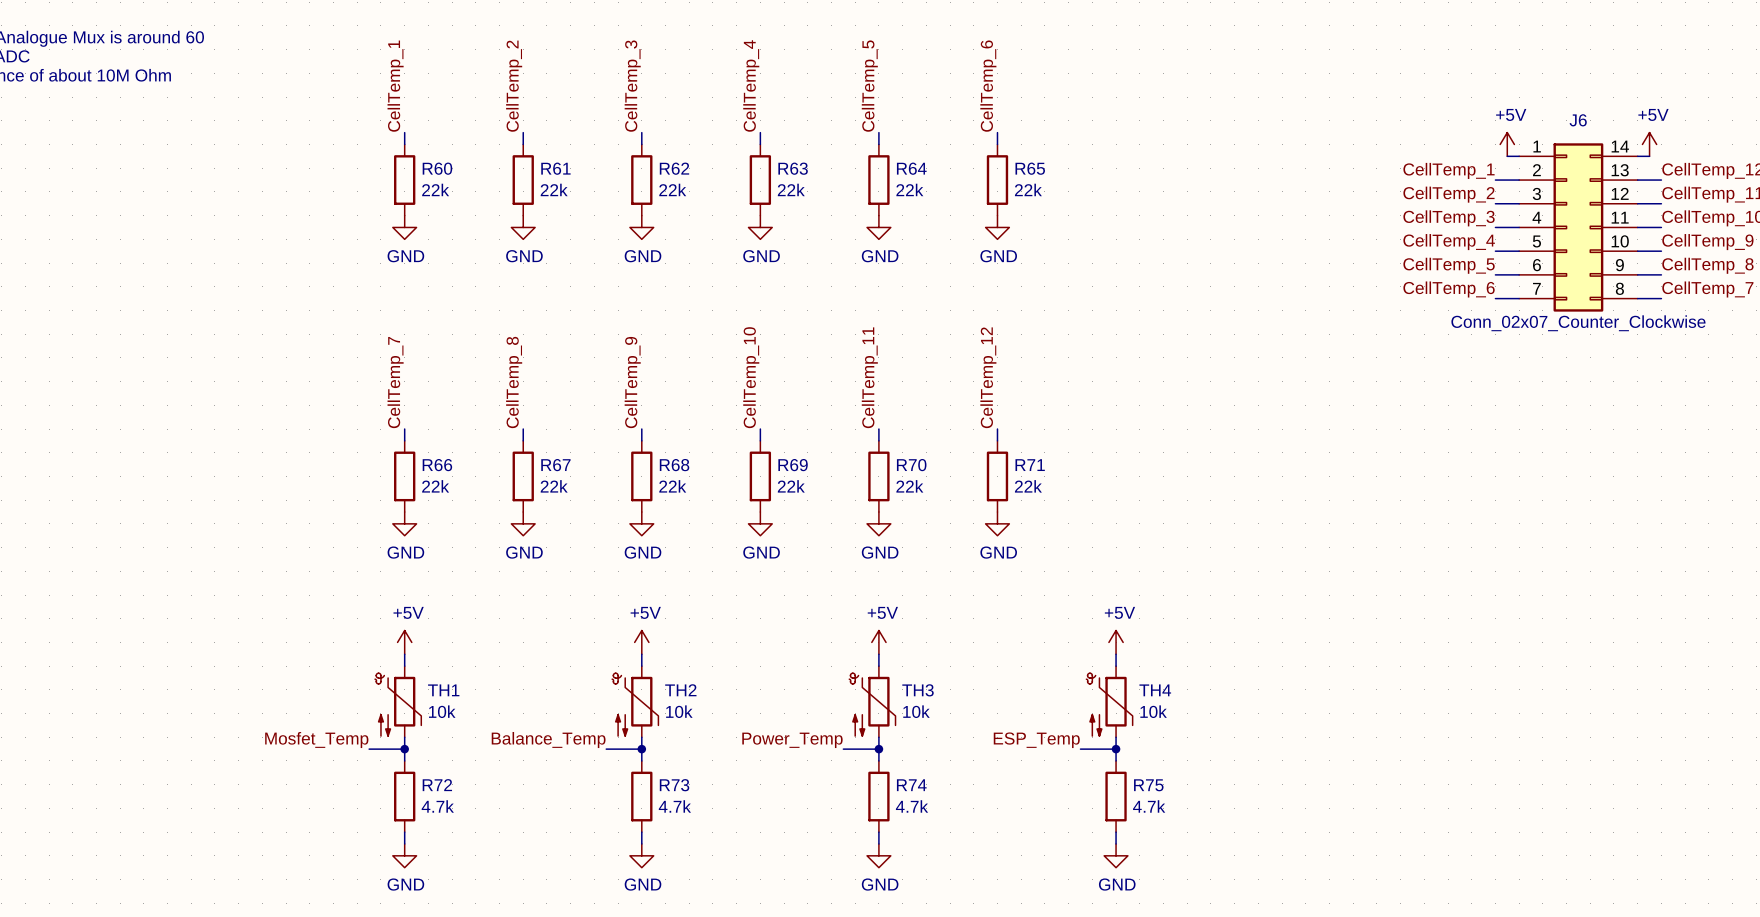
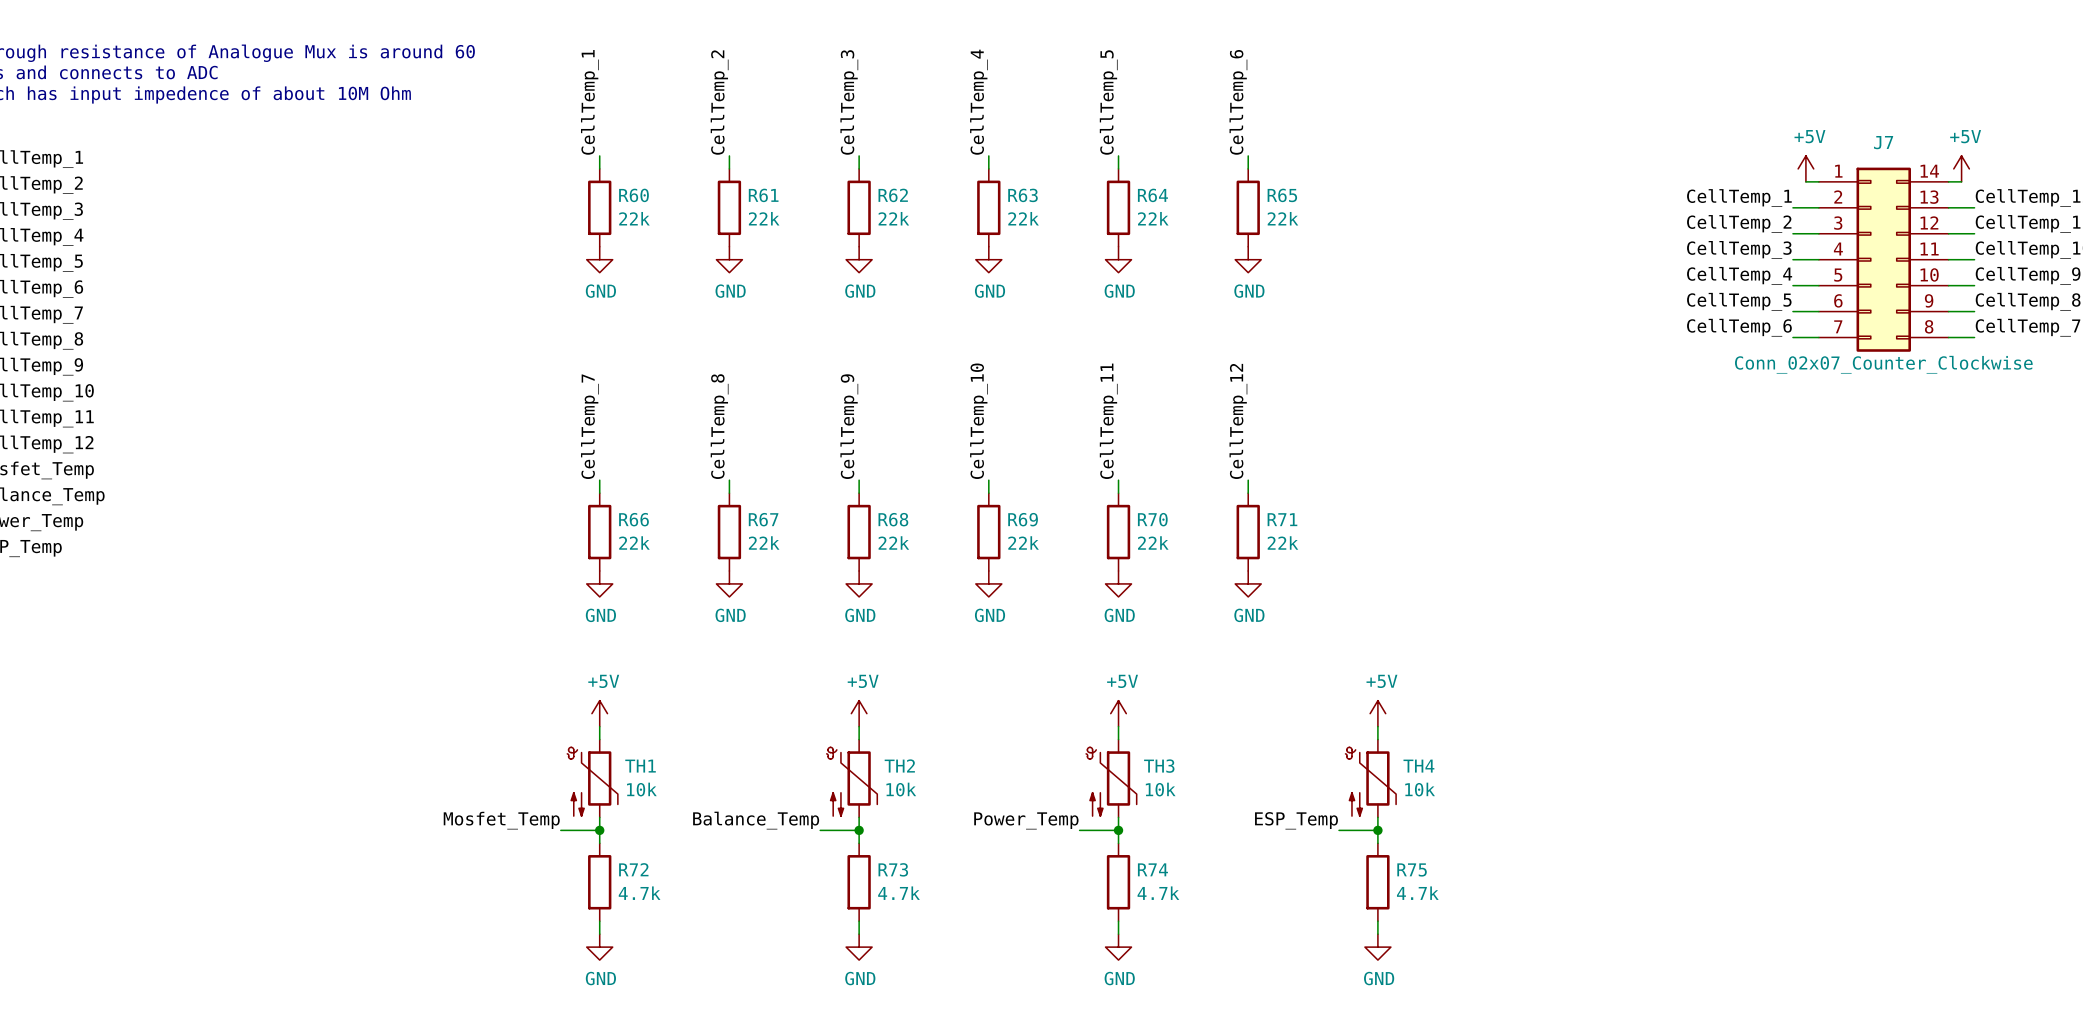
J6 name: J6 (1578, 120) -> J7 (1883, 142)

